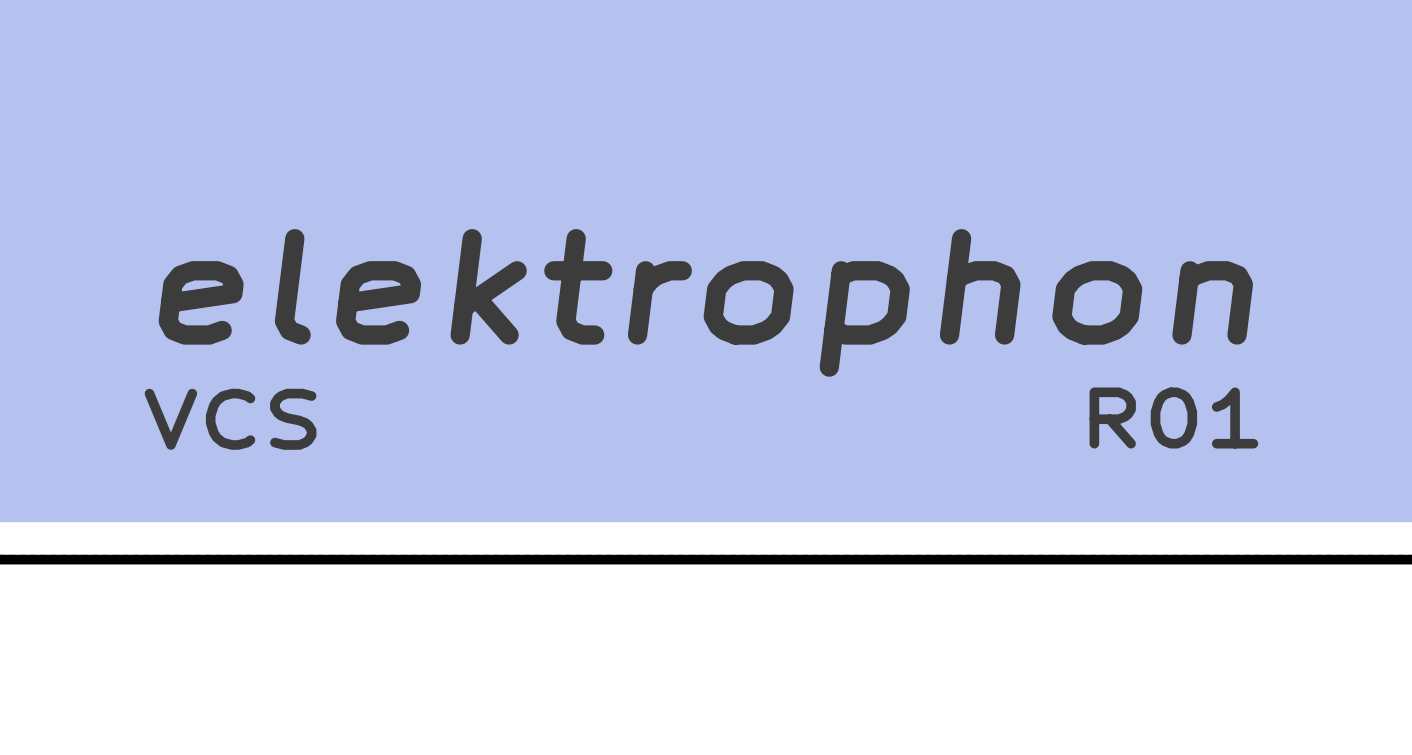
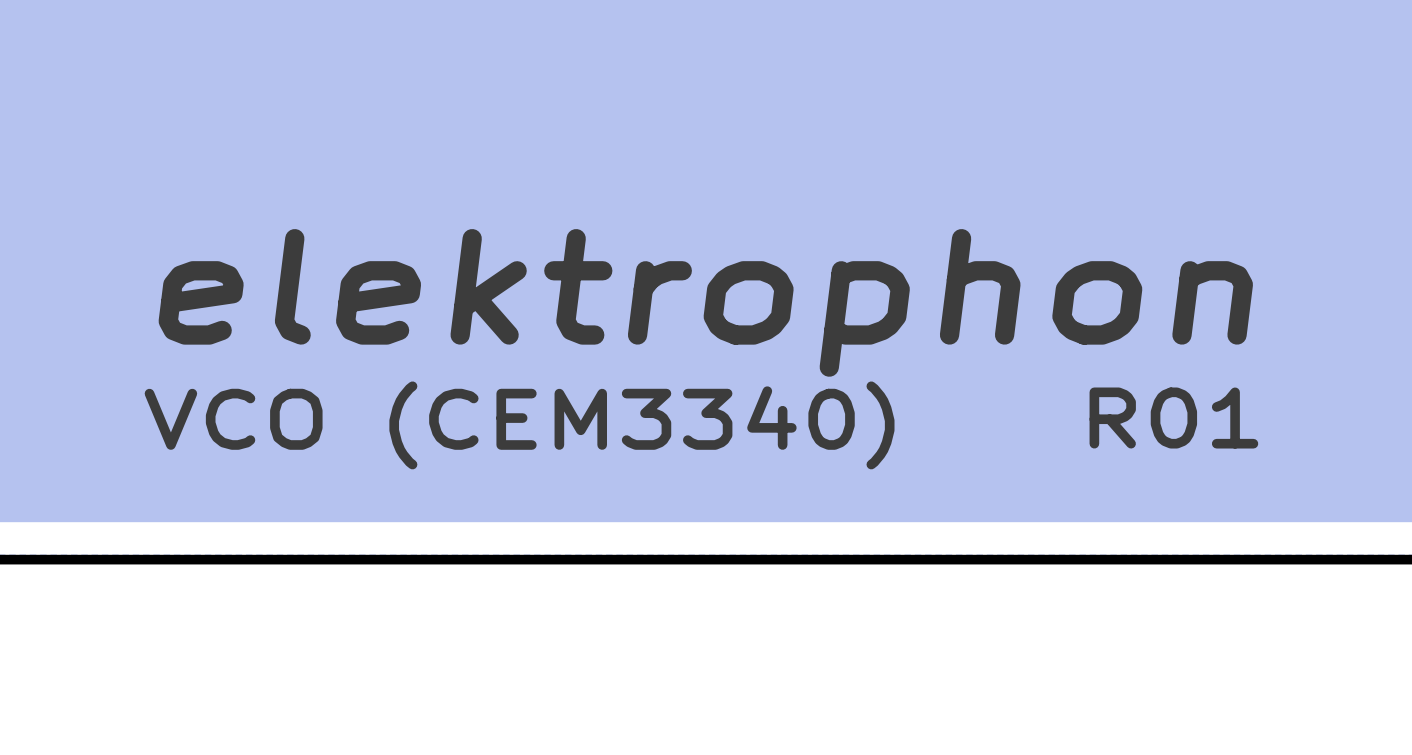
drawing shape: [144, 229, 1259, 450] -> [144, 229, 1259, 470]

